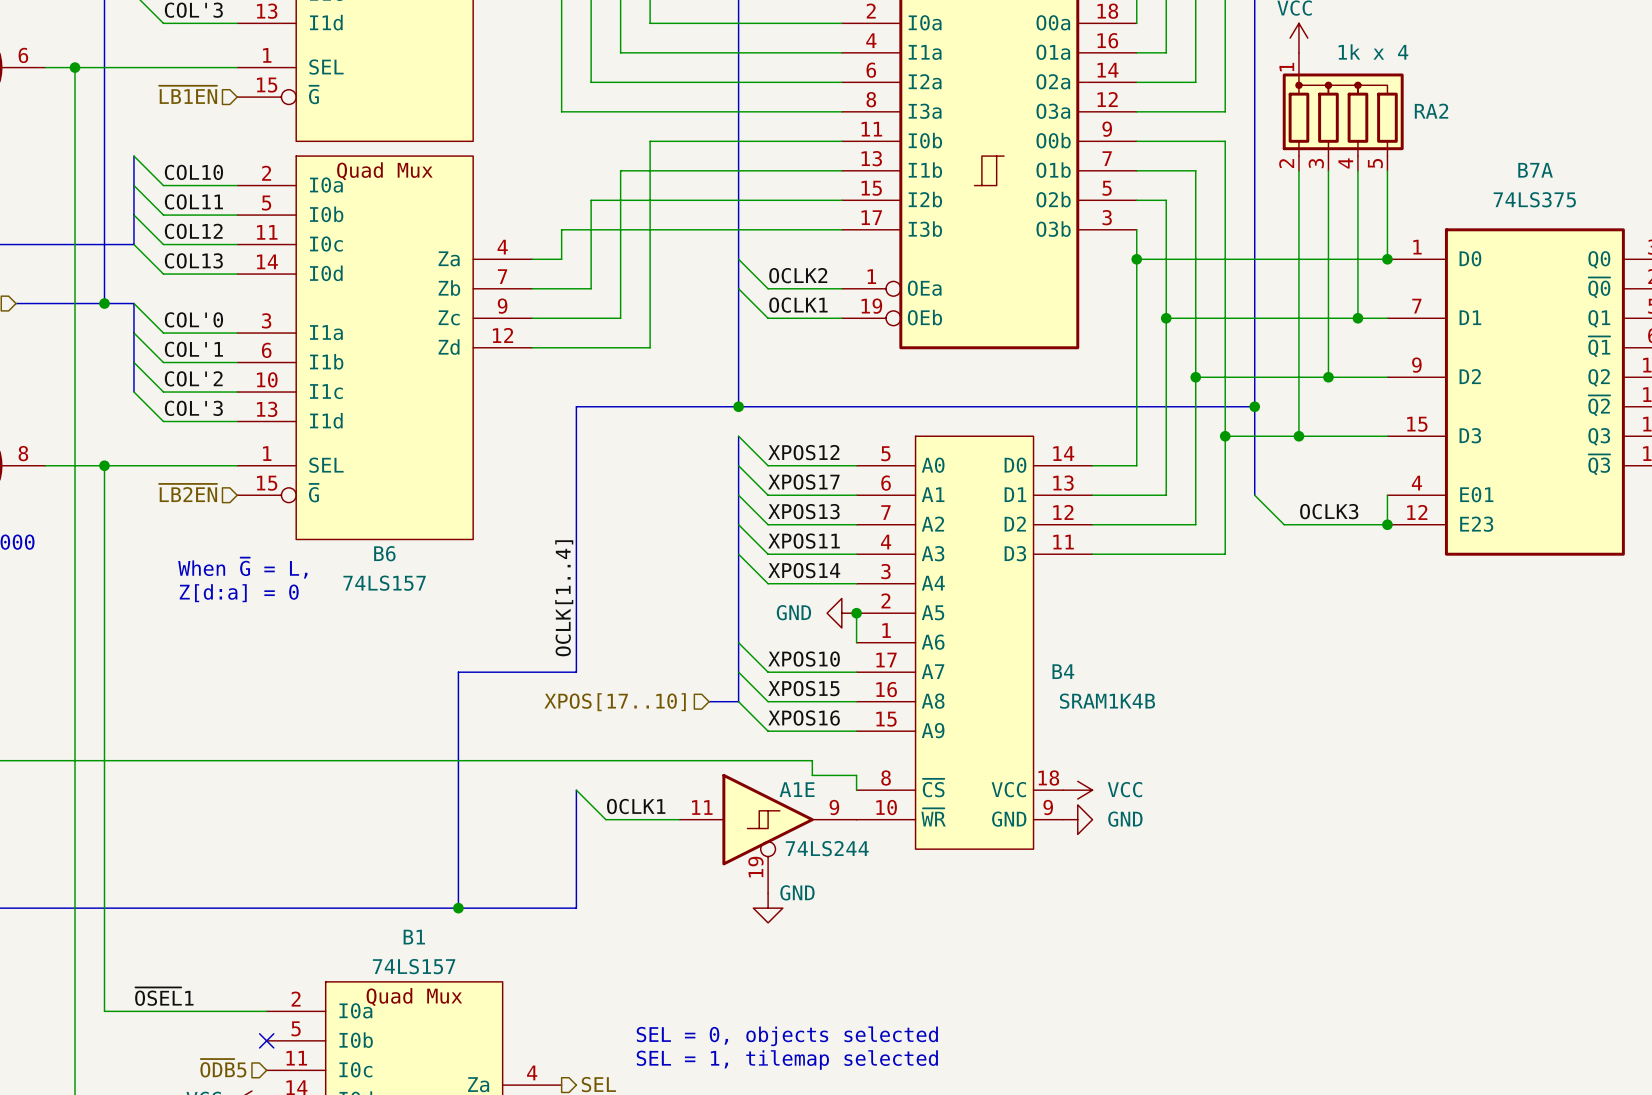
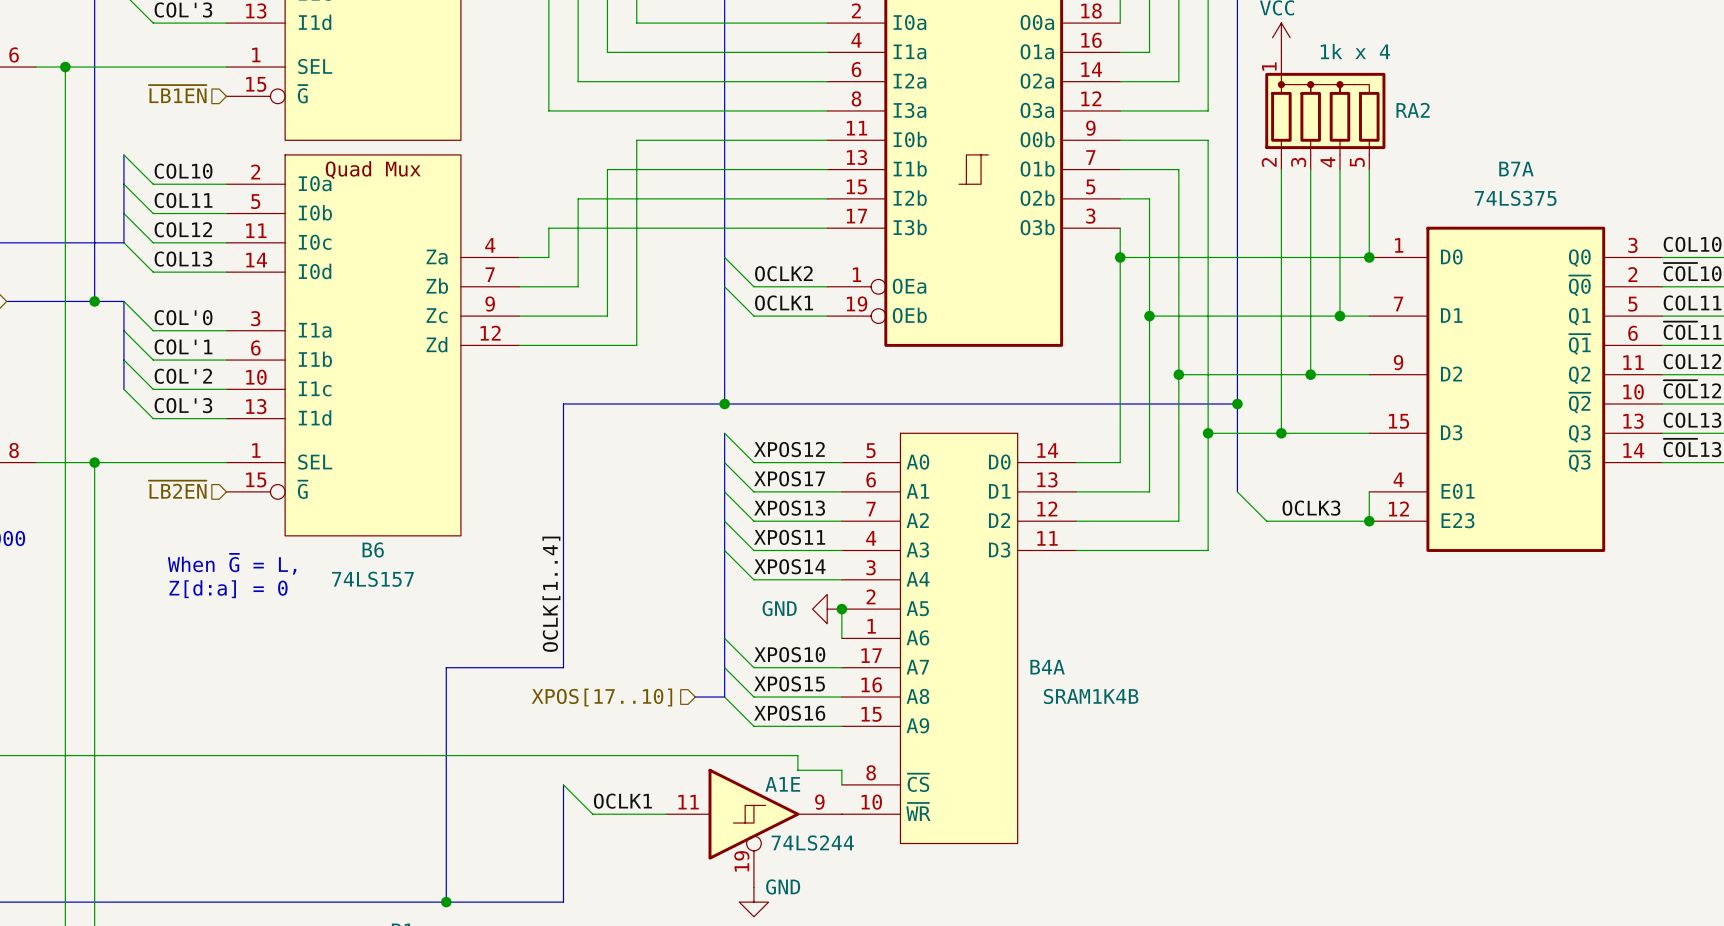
B4: SRAM1K4B (974, 642) -> none
B4A: none -> SRAM1K4B (959, 638)
power symbol: VCC (1077, 790) -> none
power symbol: GND (1077, 819) -> none

